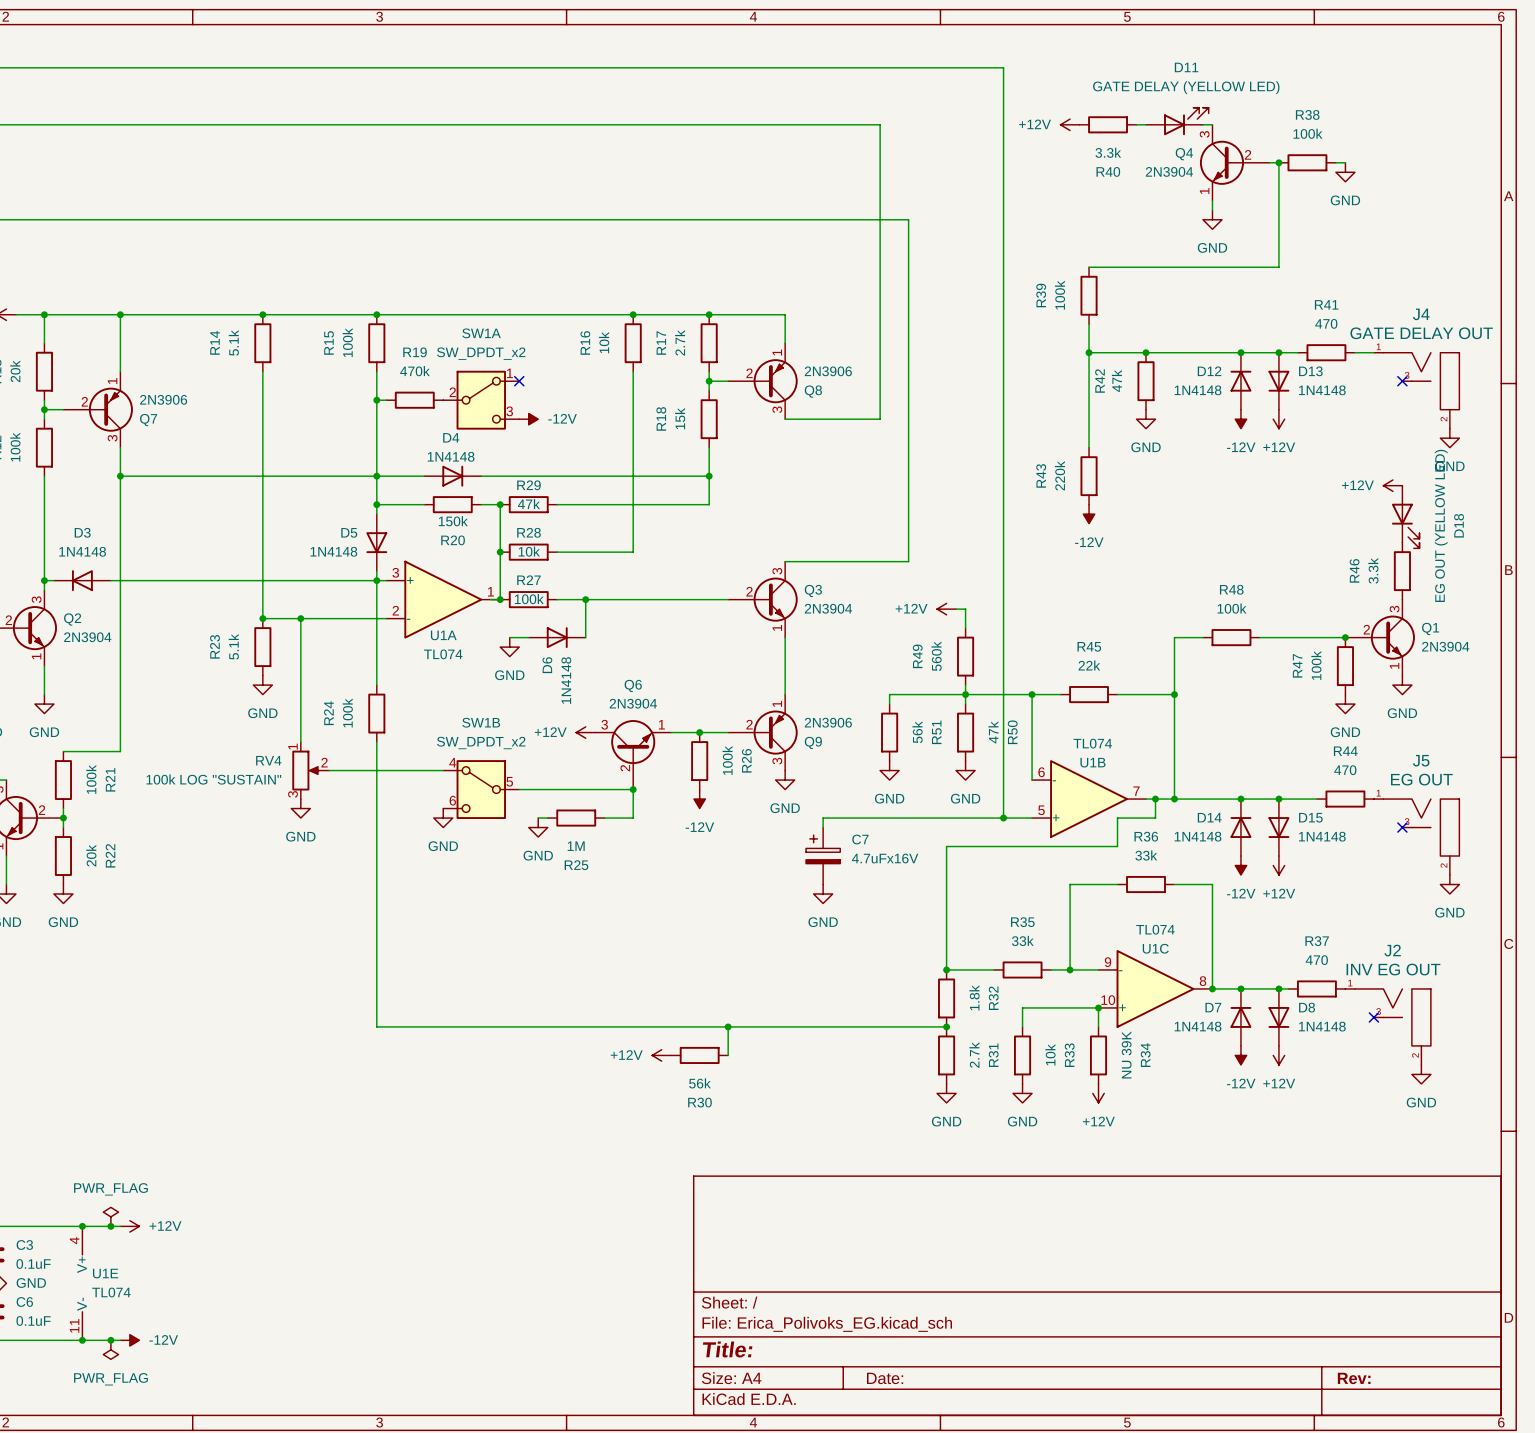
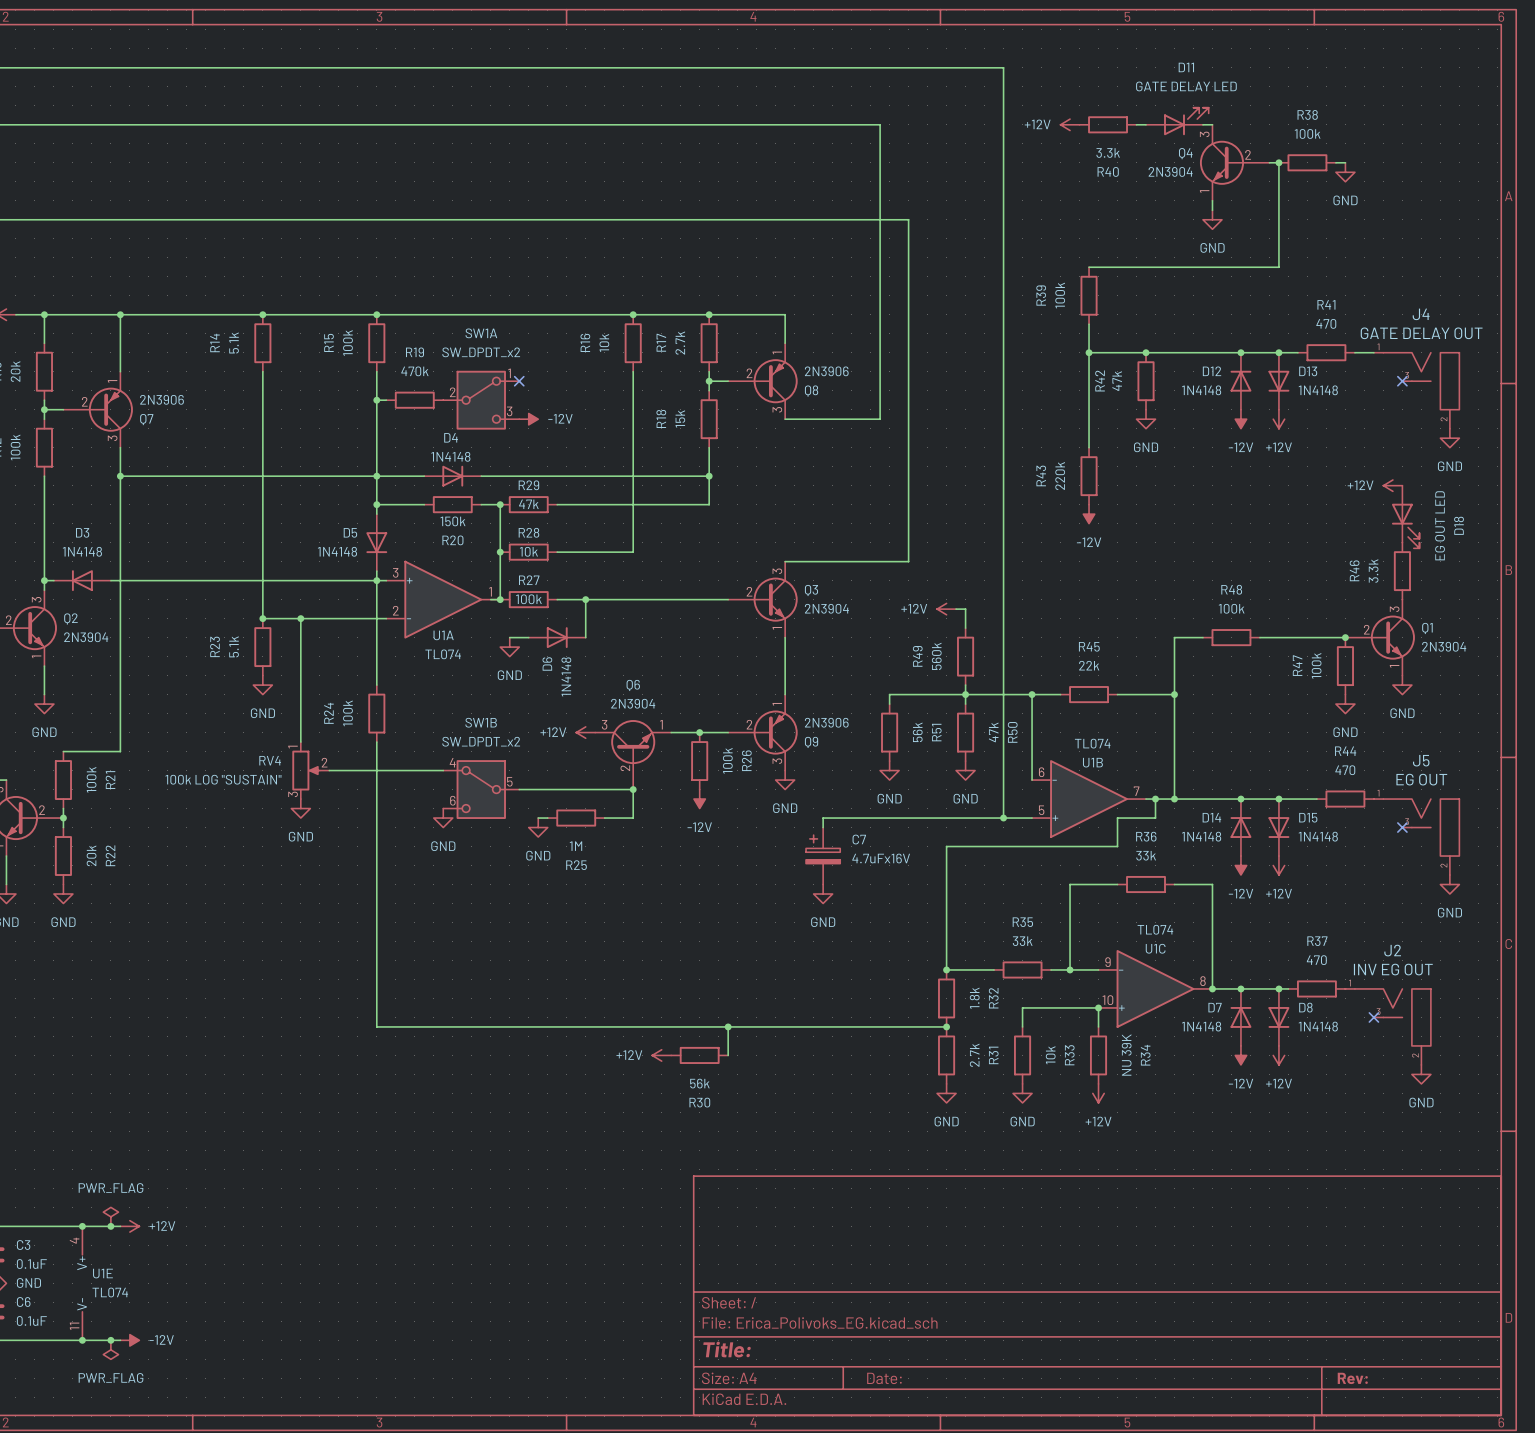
D11 value: GATE DELAY (YELLOW LED) (1186, 87) -> GATE DELAY LED (1186, 86)
D18 value: EG OUT (YELLOW LED) (1441, 525) -> EG OUT LED (1440, 525)

